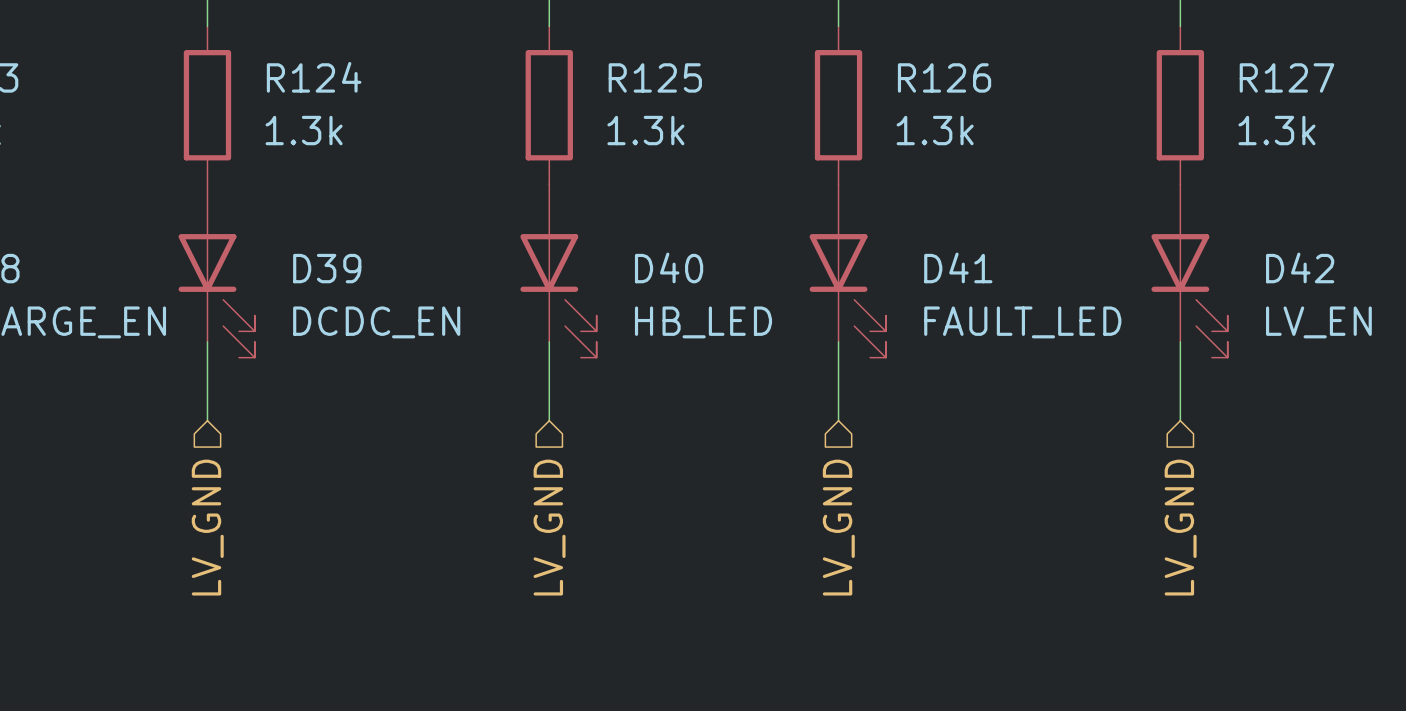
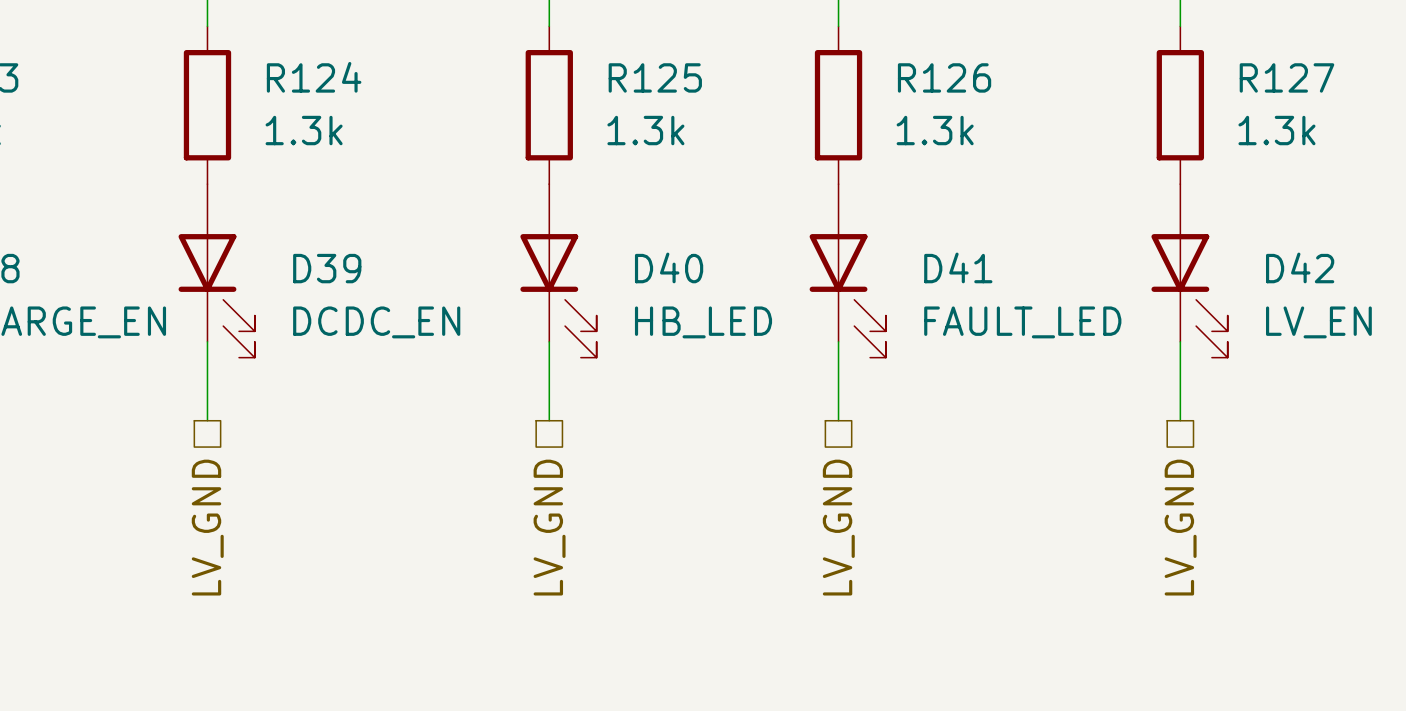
hierarchical label shape: input (207, 527) -> passive (207, 527)
hierarchical label shape: input (549, 527) -> passive (549, 527)
hierarchical label shape: input (838, 527) -> passive (838, 527)
hierarchical label shape: input (1180, 527) -> passive (1180, 527)

